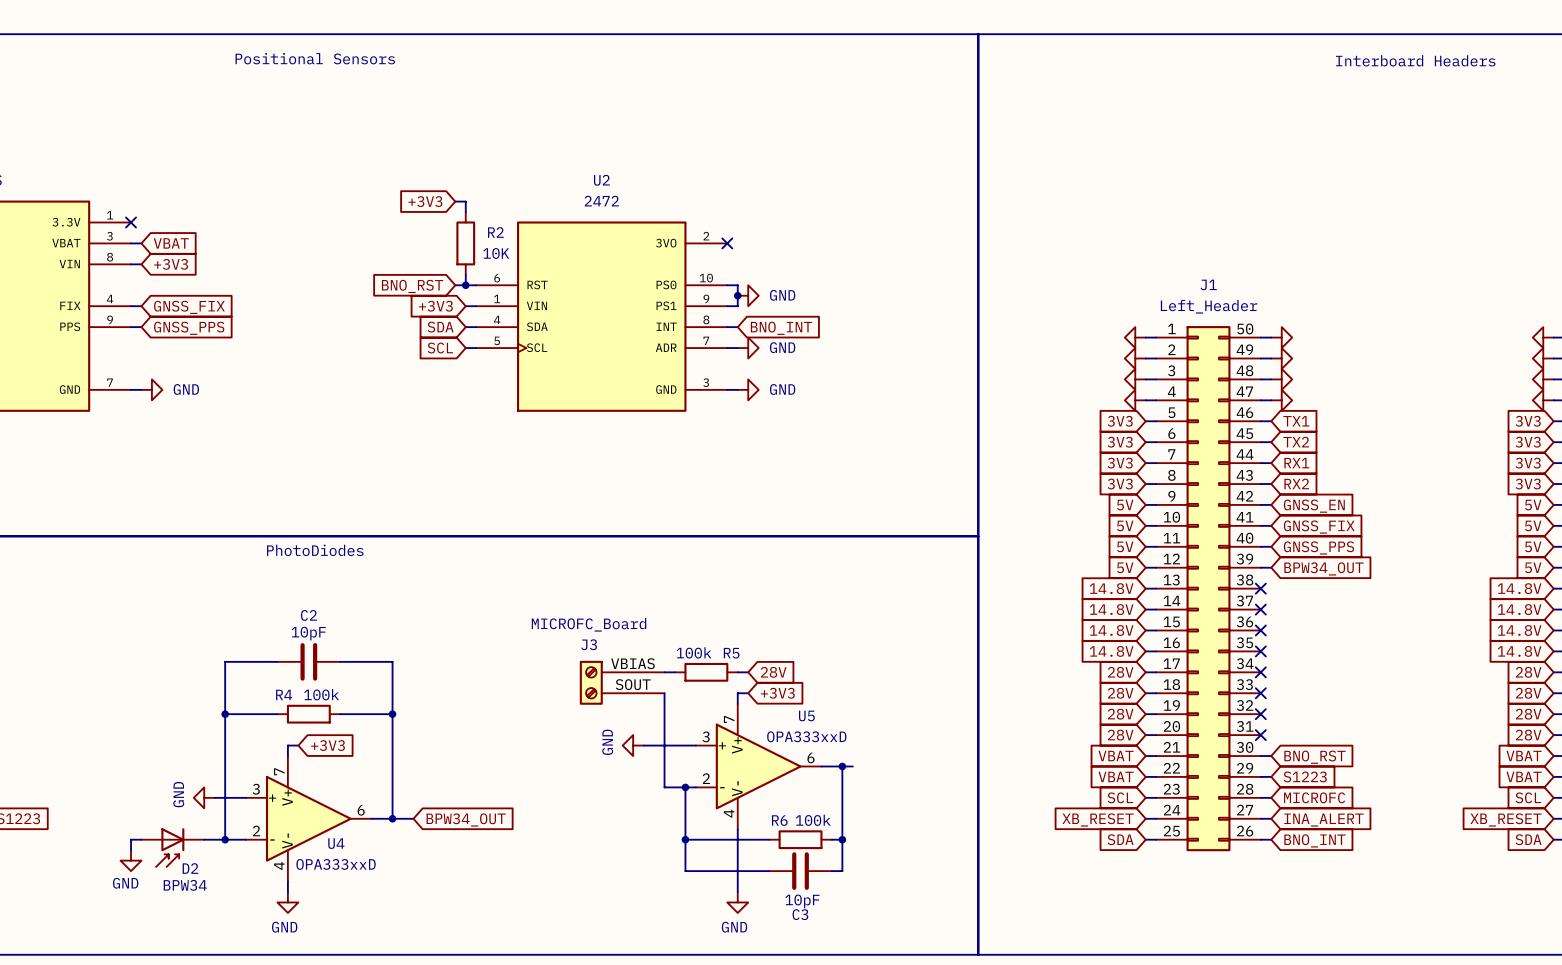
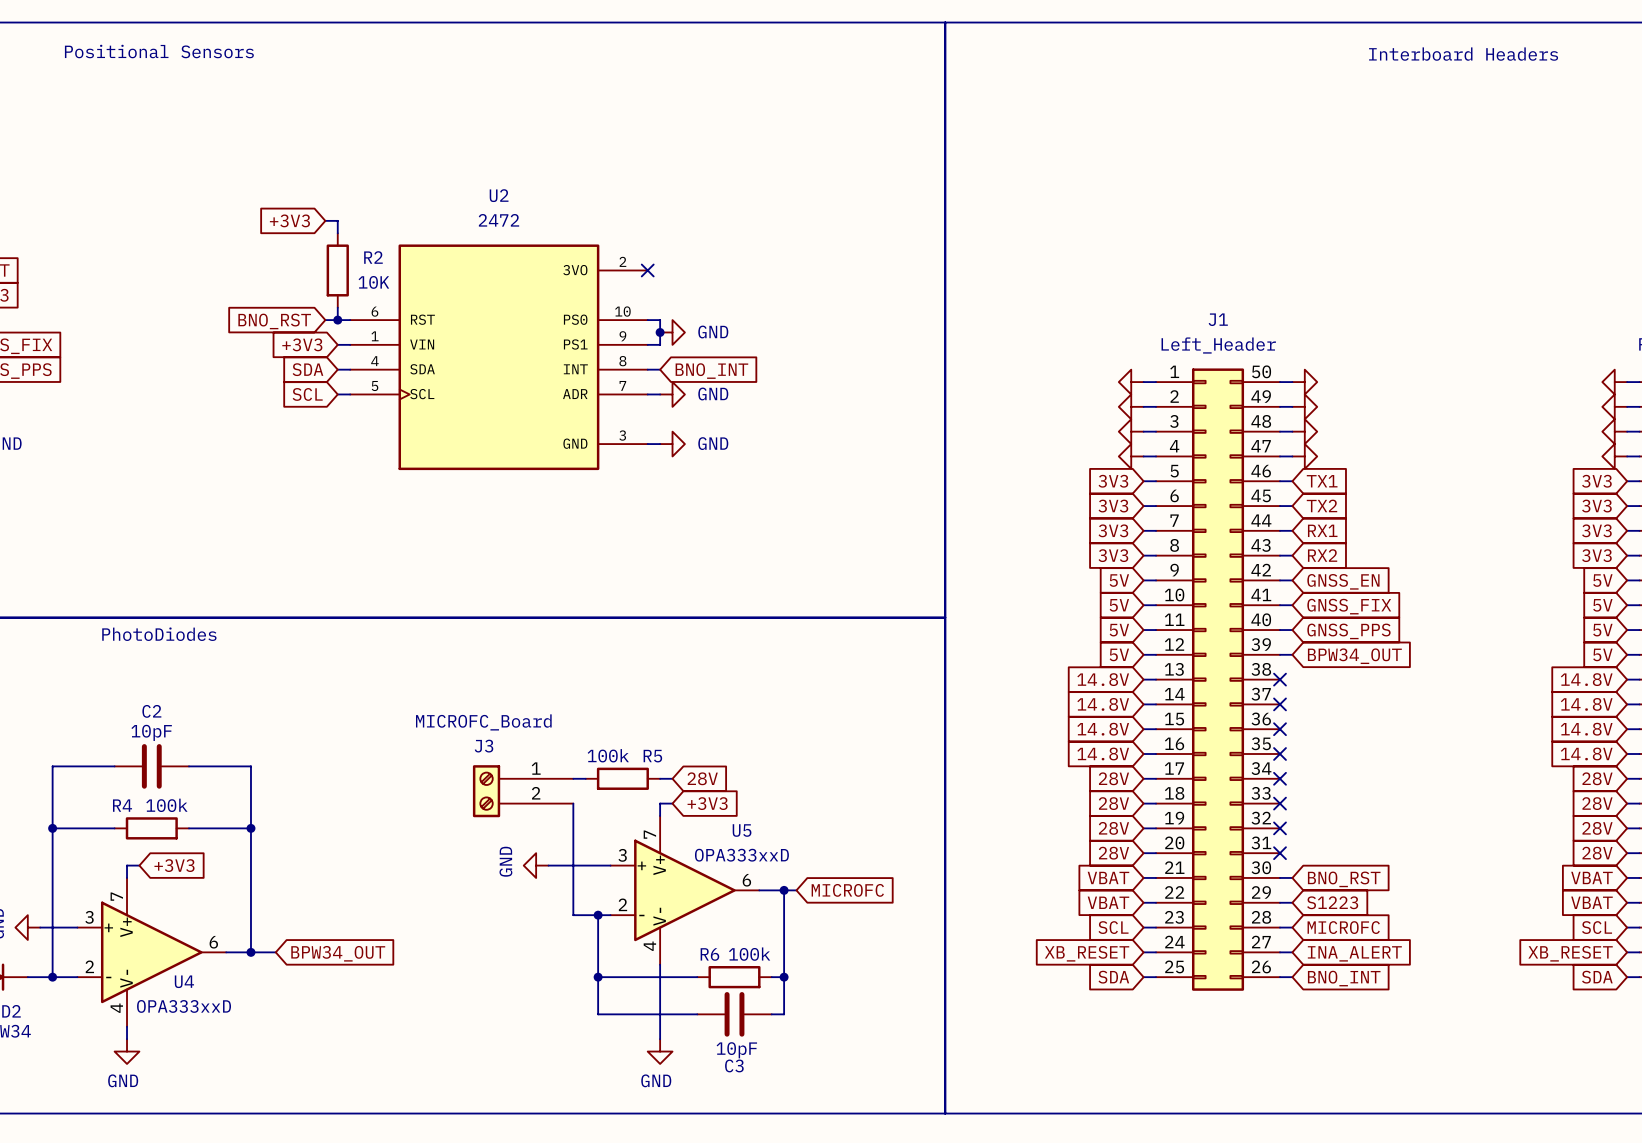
J3 pin number: VBIAS (632, 663) -> 1 (536, 768)
J3 pin number: SOUT (633, 684) -> 2 (536, 793)
global label: none -> MICROFC (847, 890)

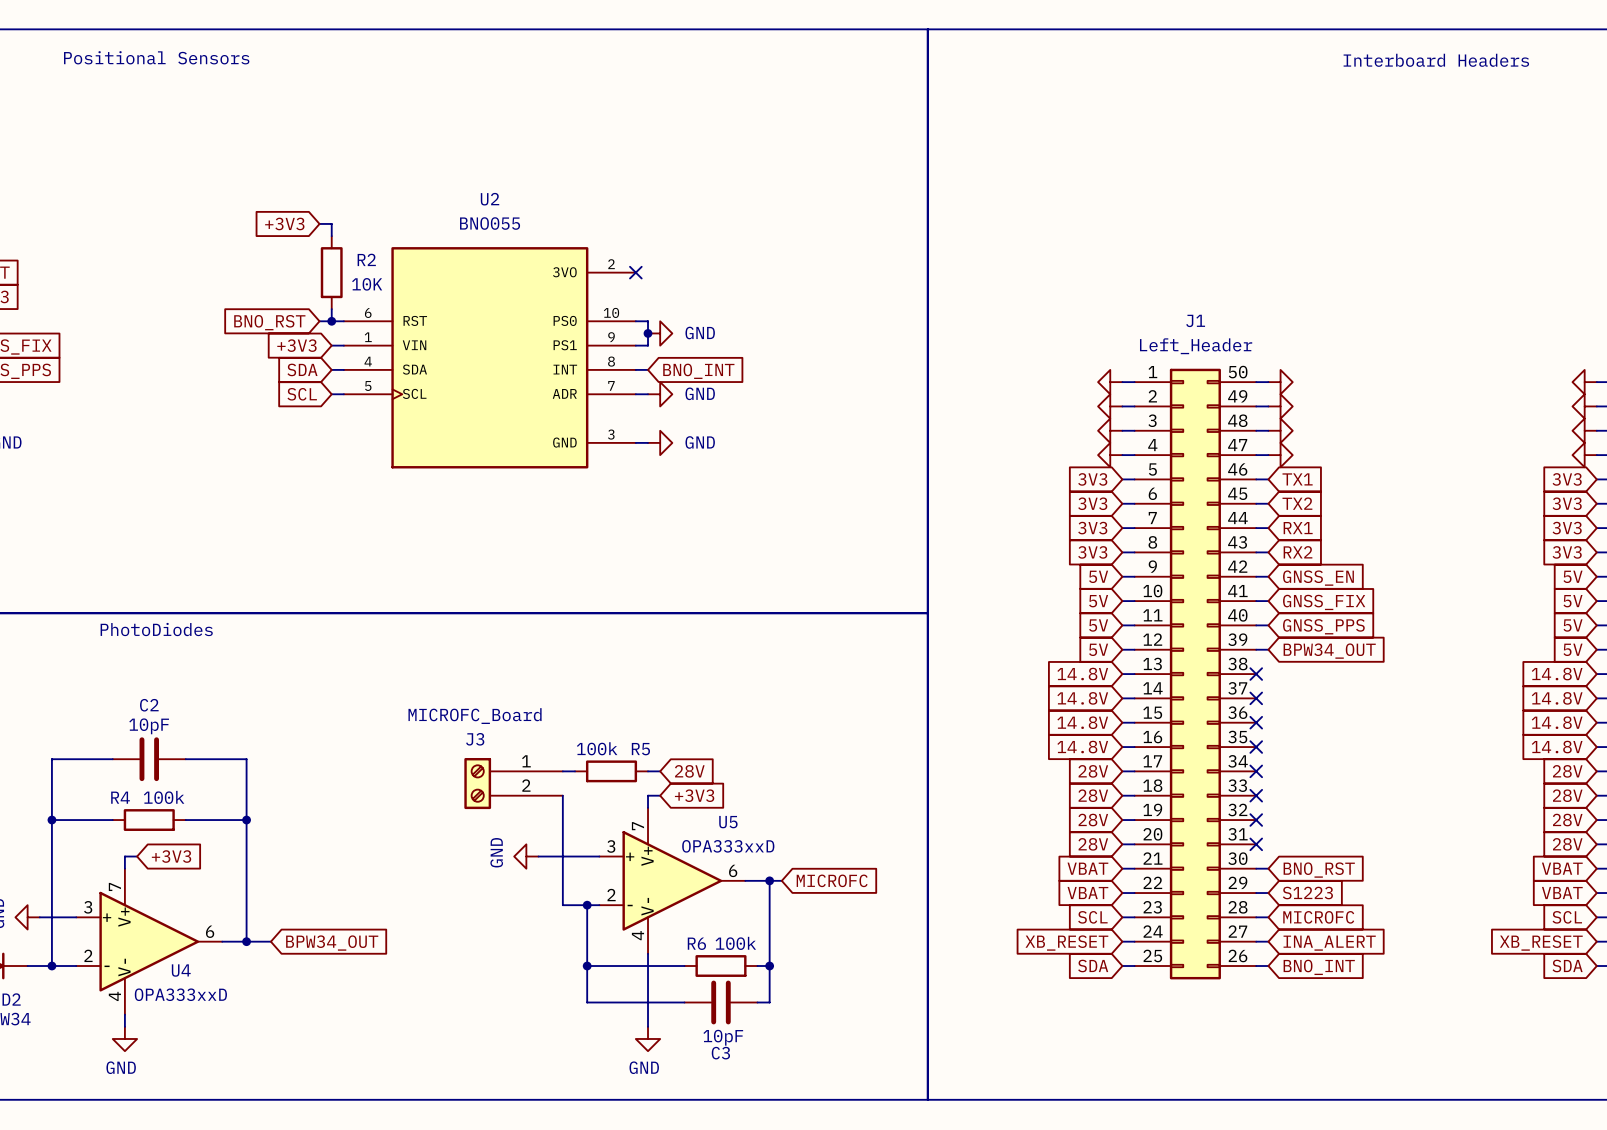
U2 value: 2472 (498, 220) -> BNO055 (490, 223)

